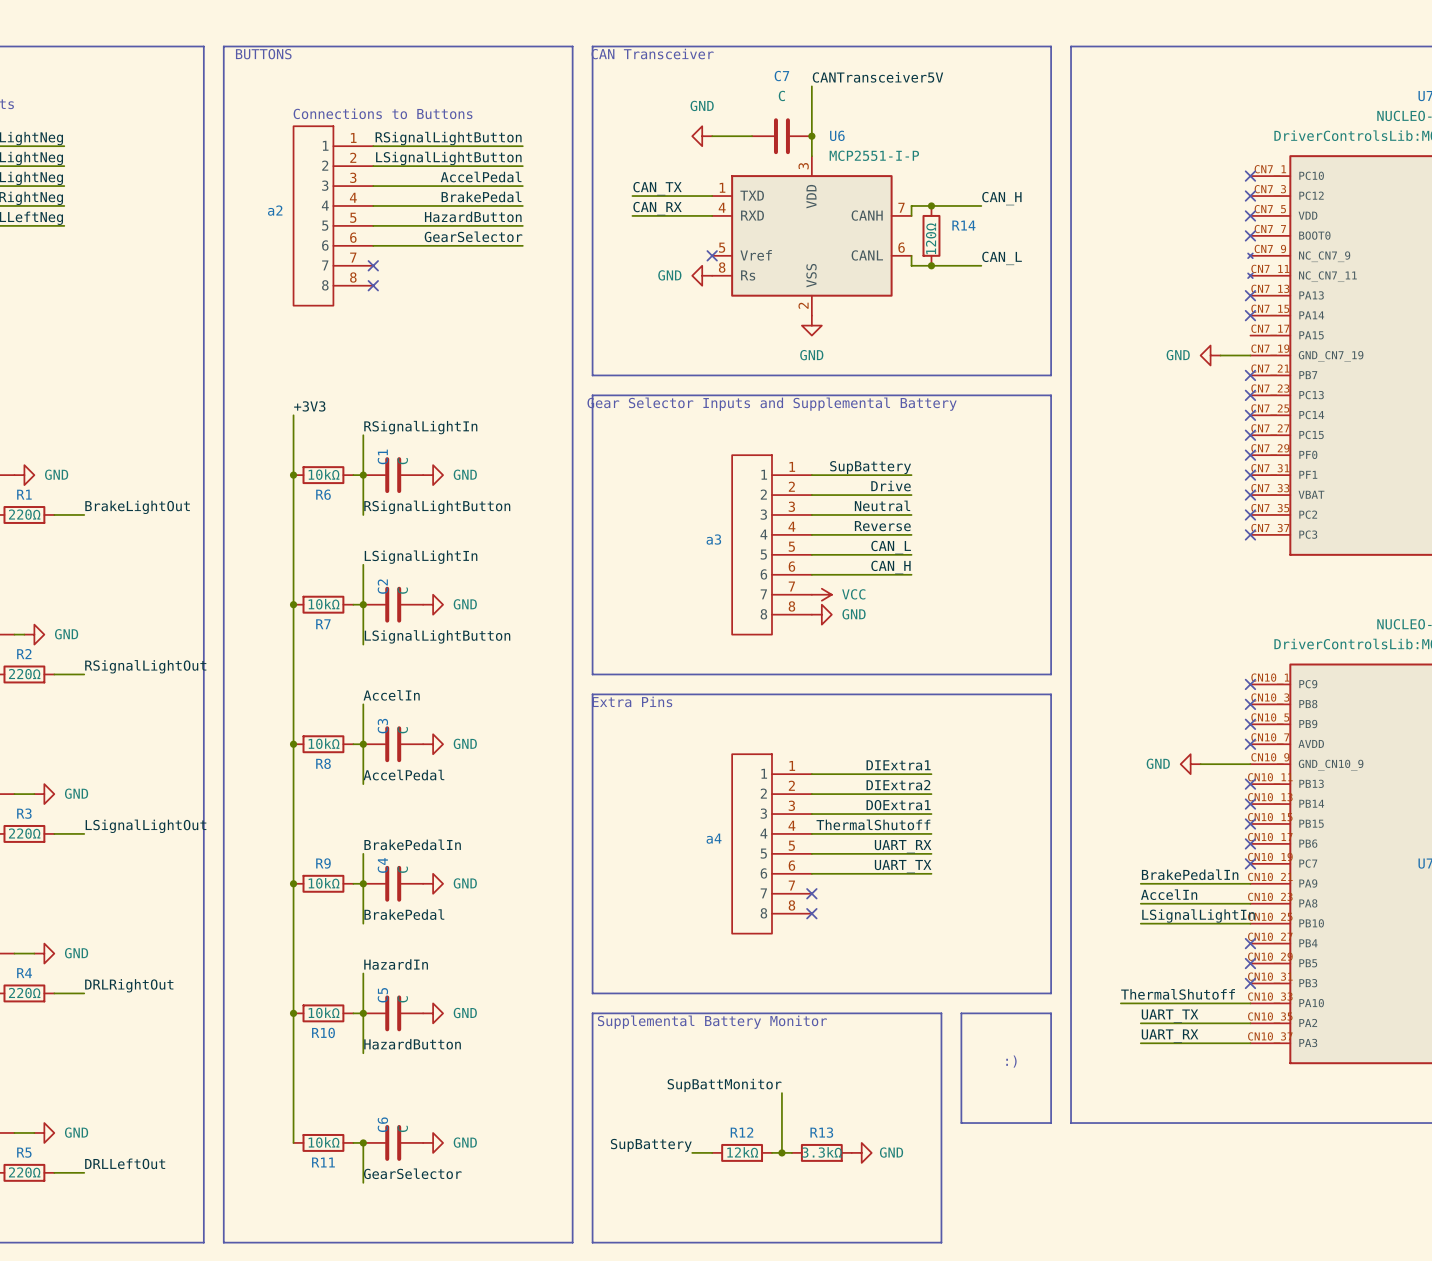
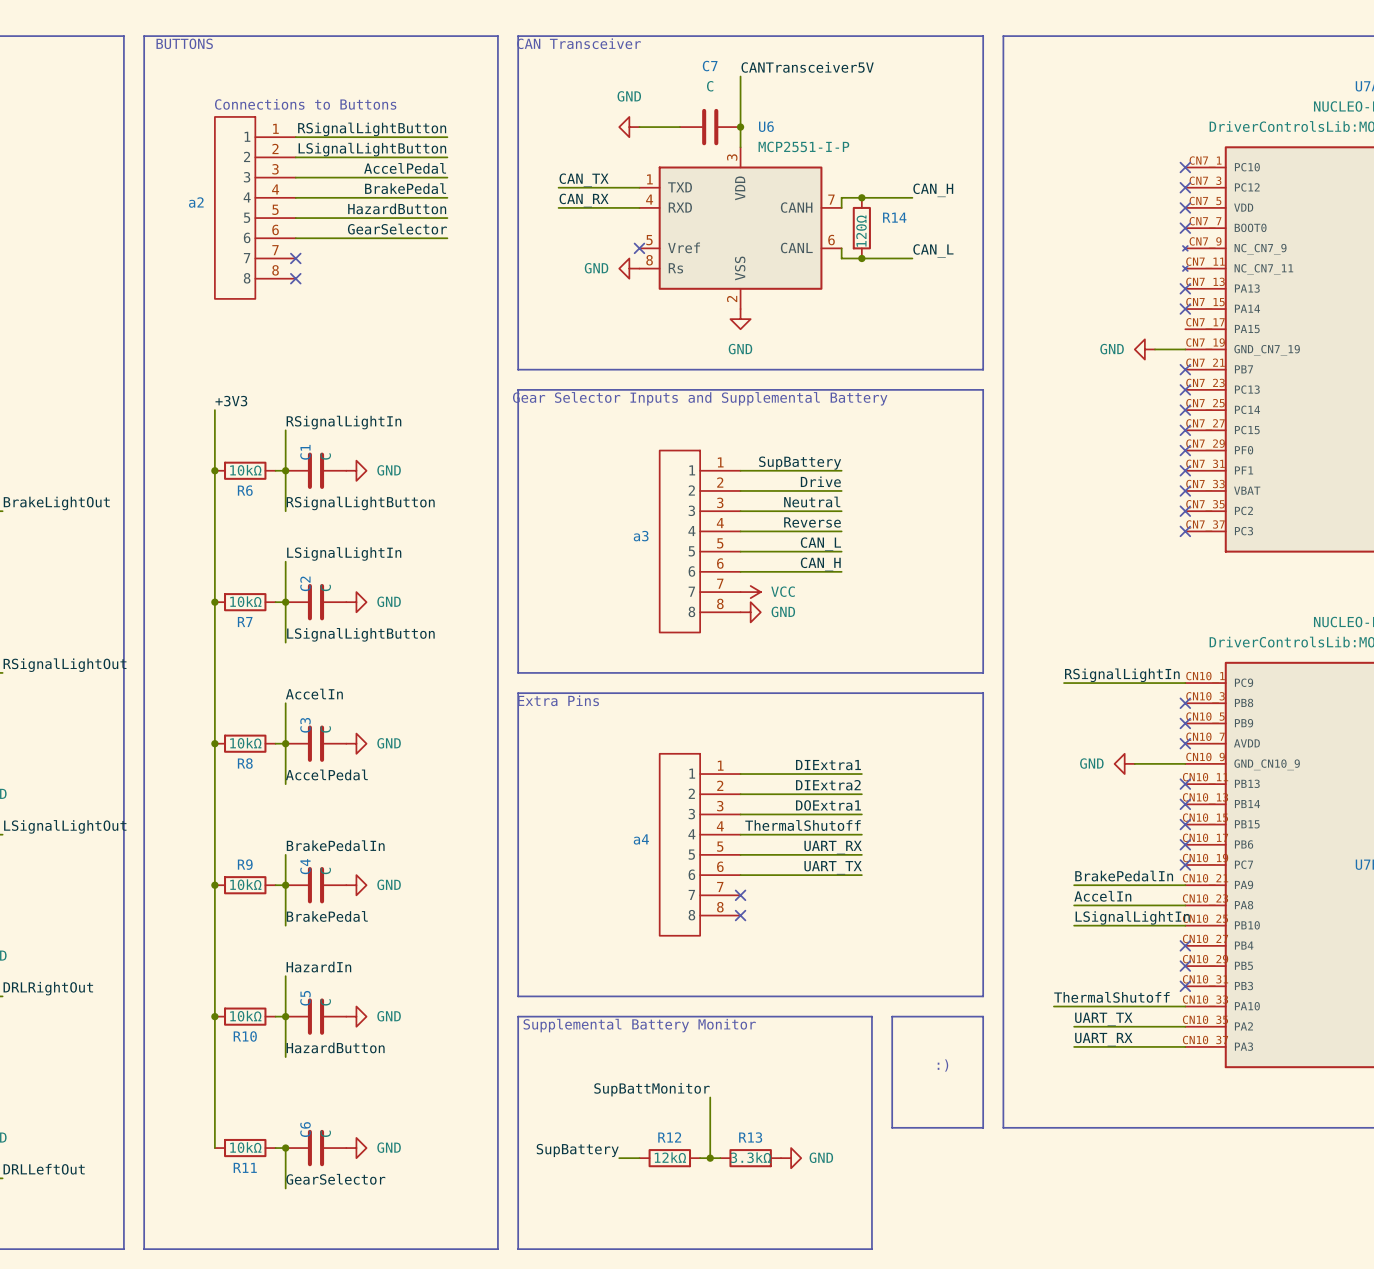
label: none -> RSignalLightIn (1122, 675)
wire: none -> (1064, 683) (1185, 683)
no-connect mark: (1250, 684) -> none

